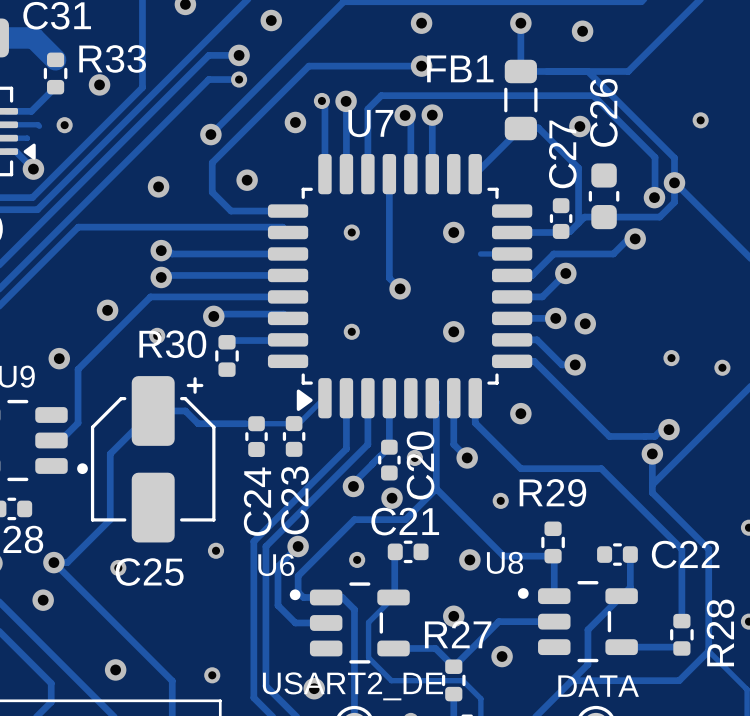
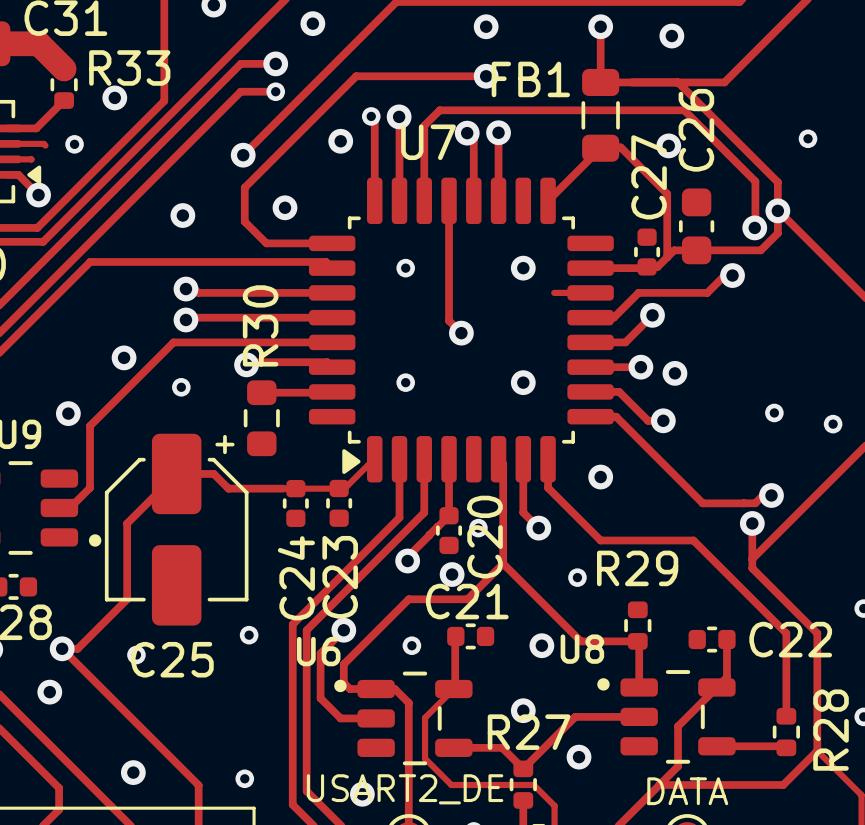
R30 footprint: [215, 335, 239, 377] -> [243, 380, 280, 457]
R30 name rotation: 0° (172, 344) -> 90° counterclockwise (260, 325)

